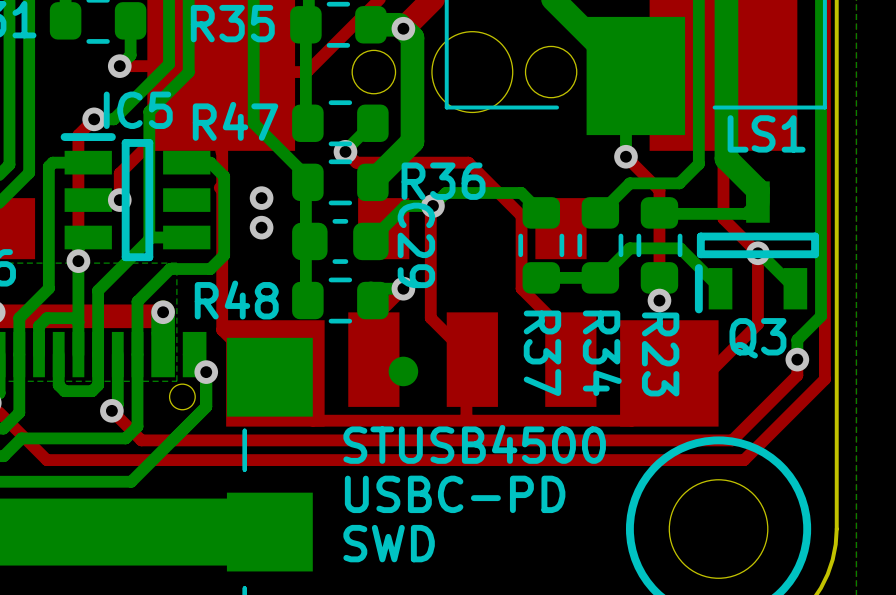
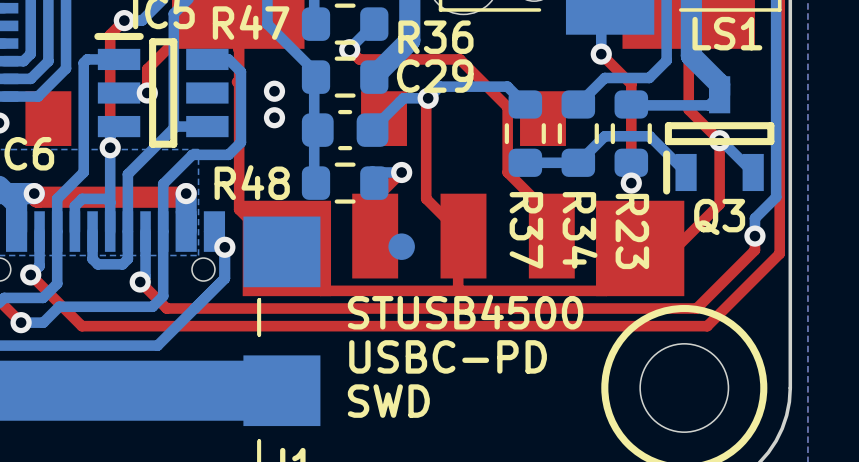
R36 name position: R36 (443, 181) -> R36 (435, 37)
C29 name rotation: 0° (416, 245) -> 90° counterclockwise (435, 76)

